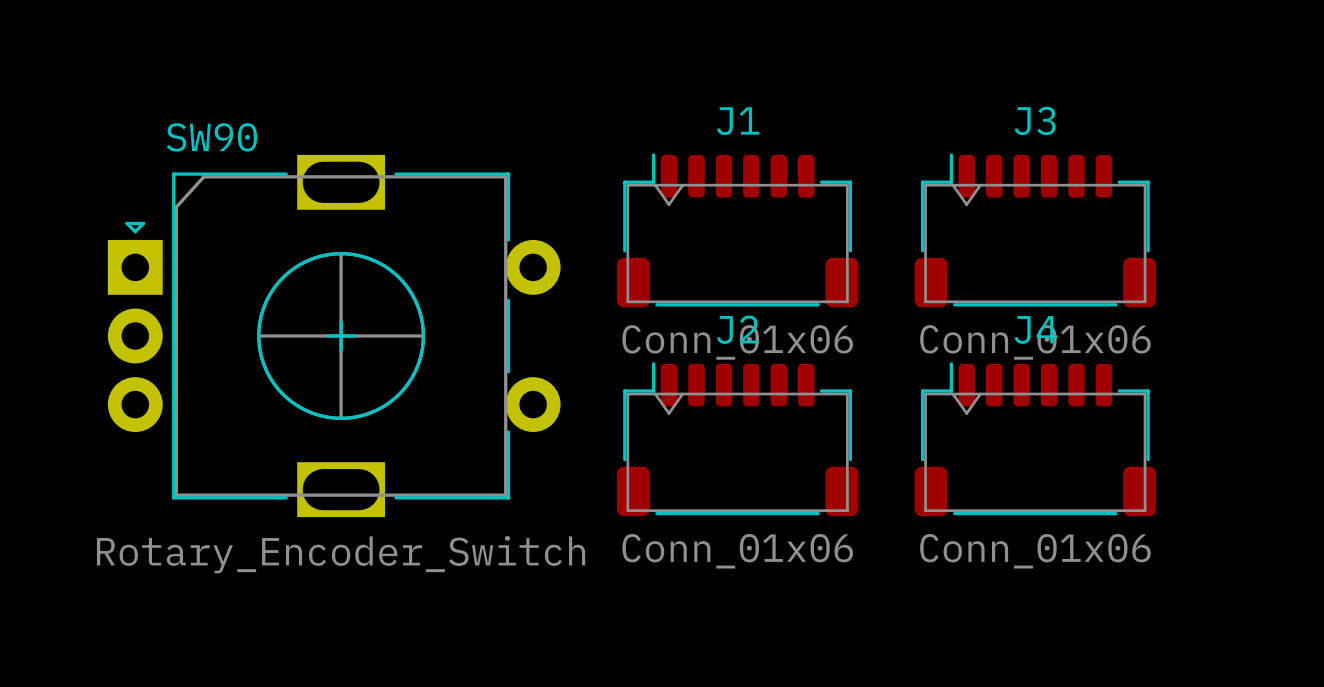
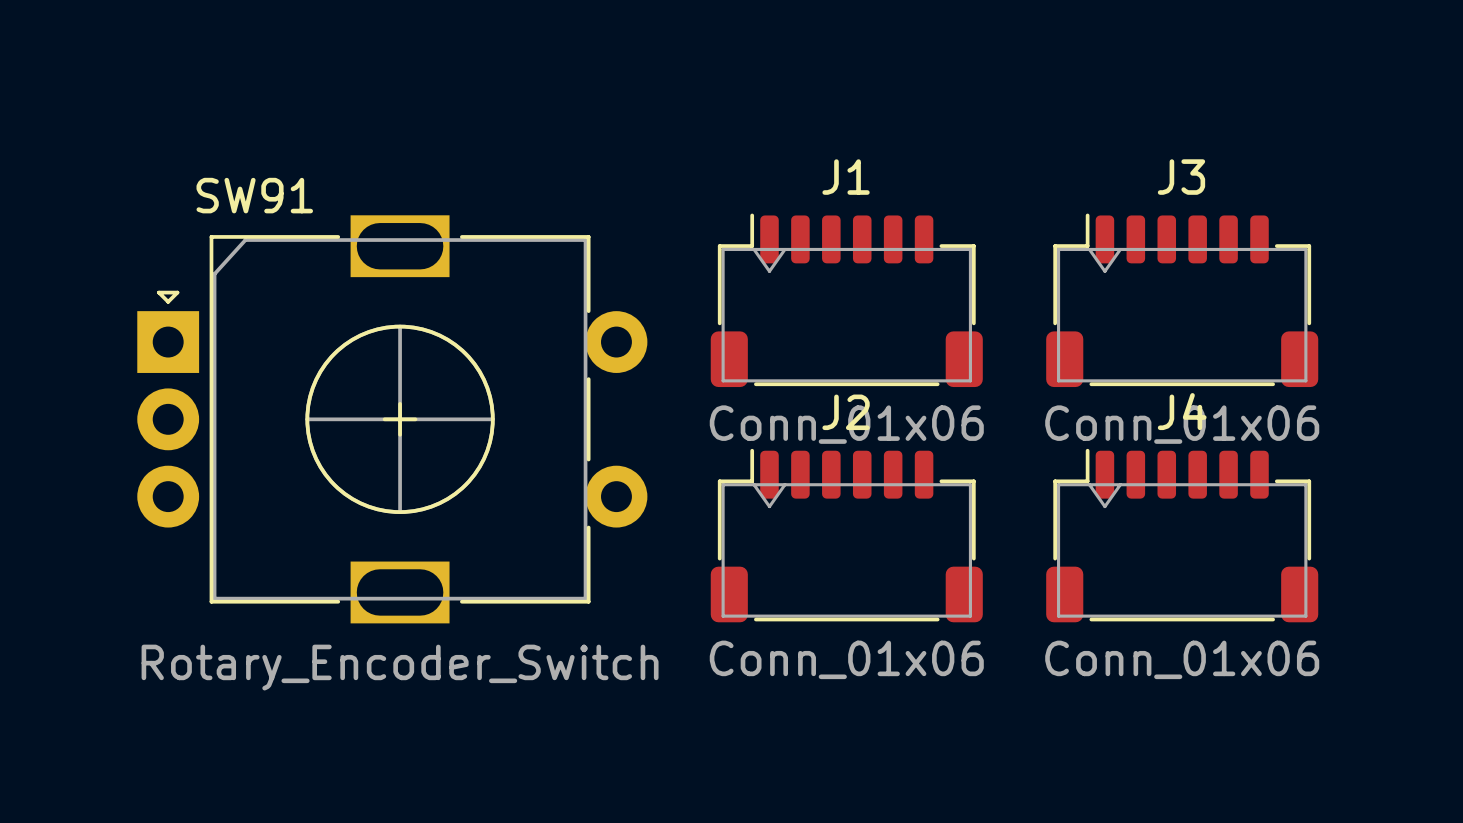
SW90 name: SW90 (211, 137) -> SW91 (254, 195)

